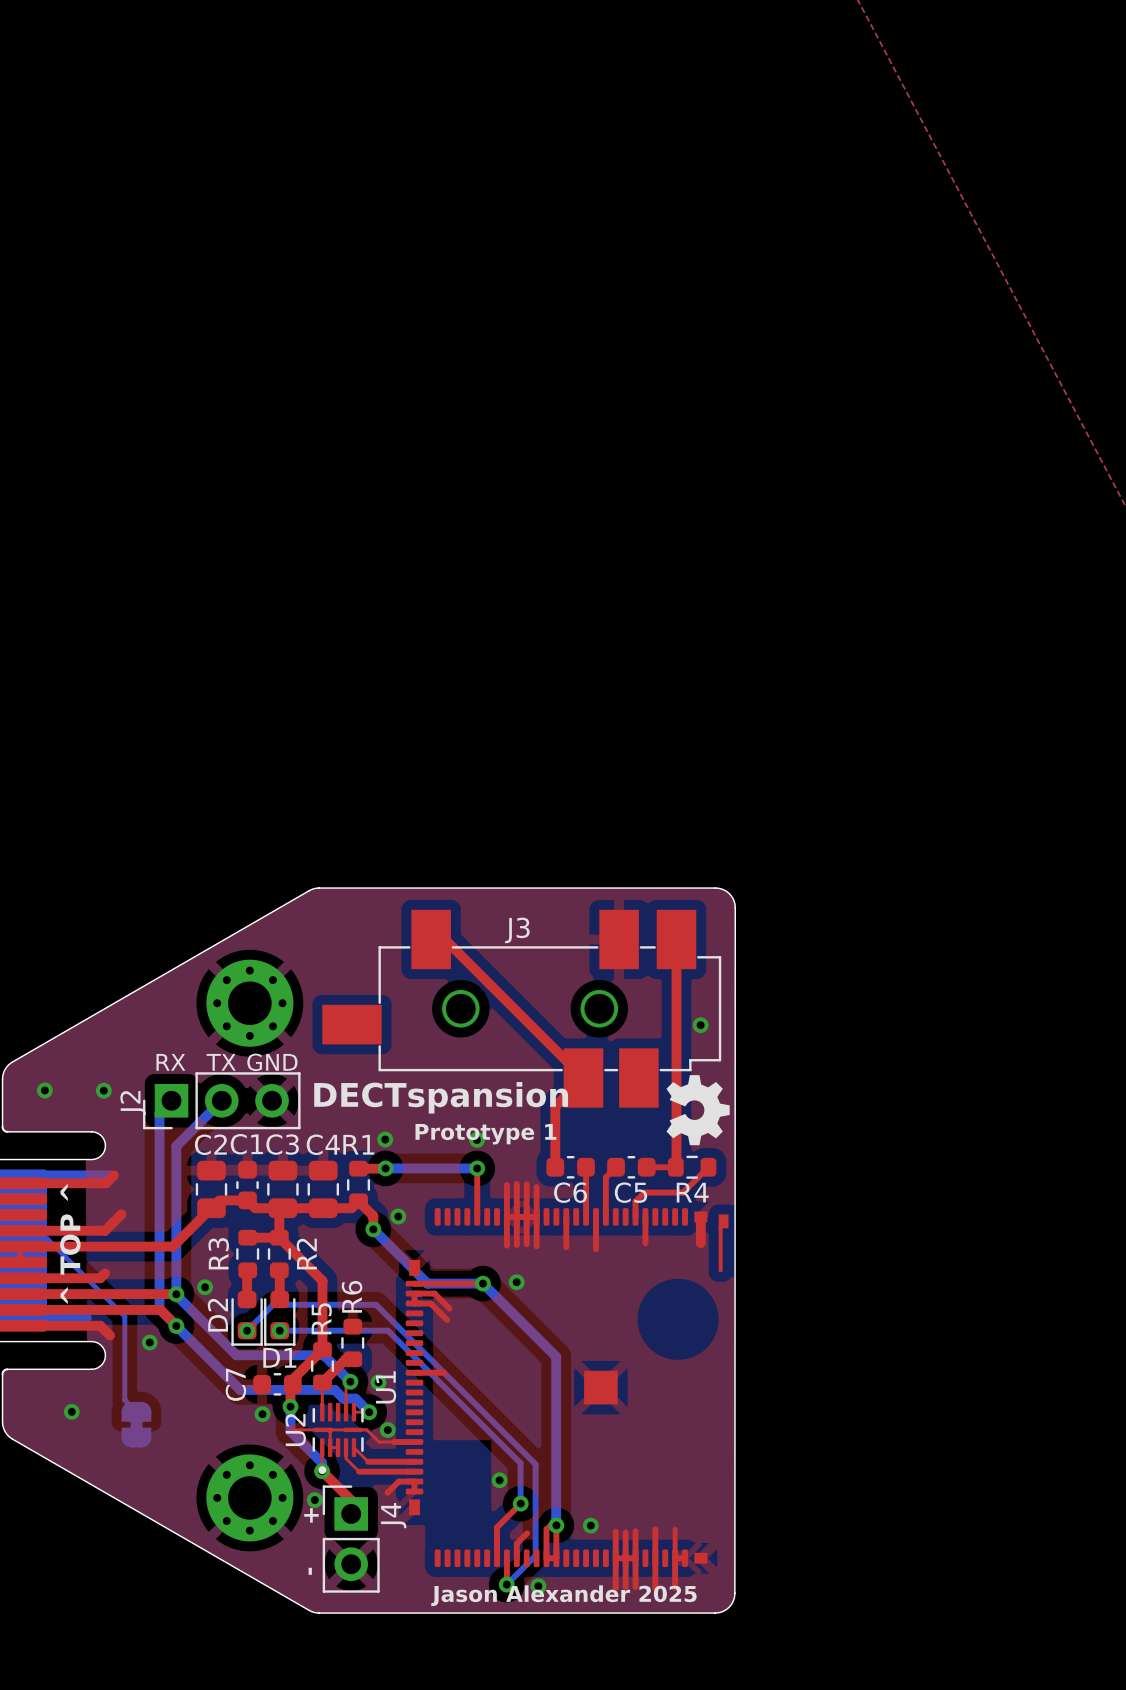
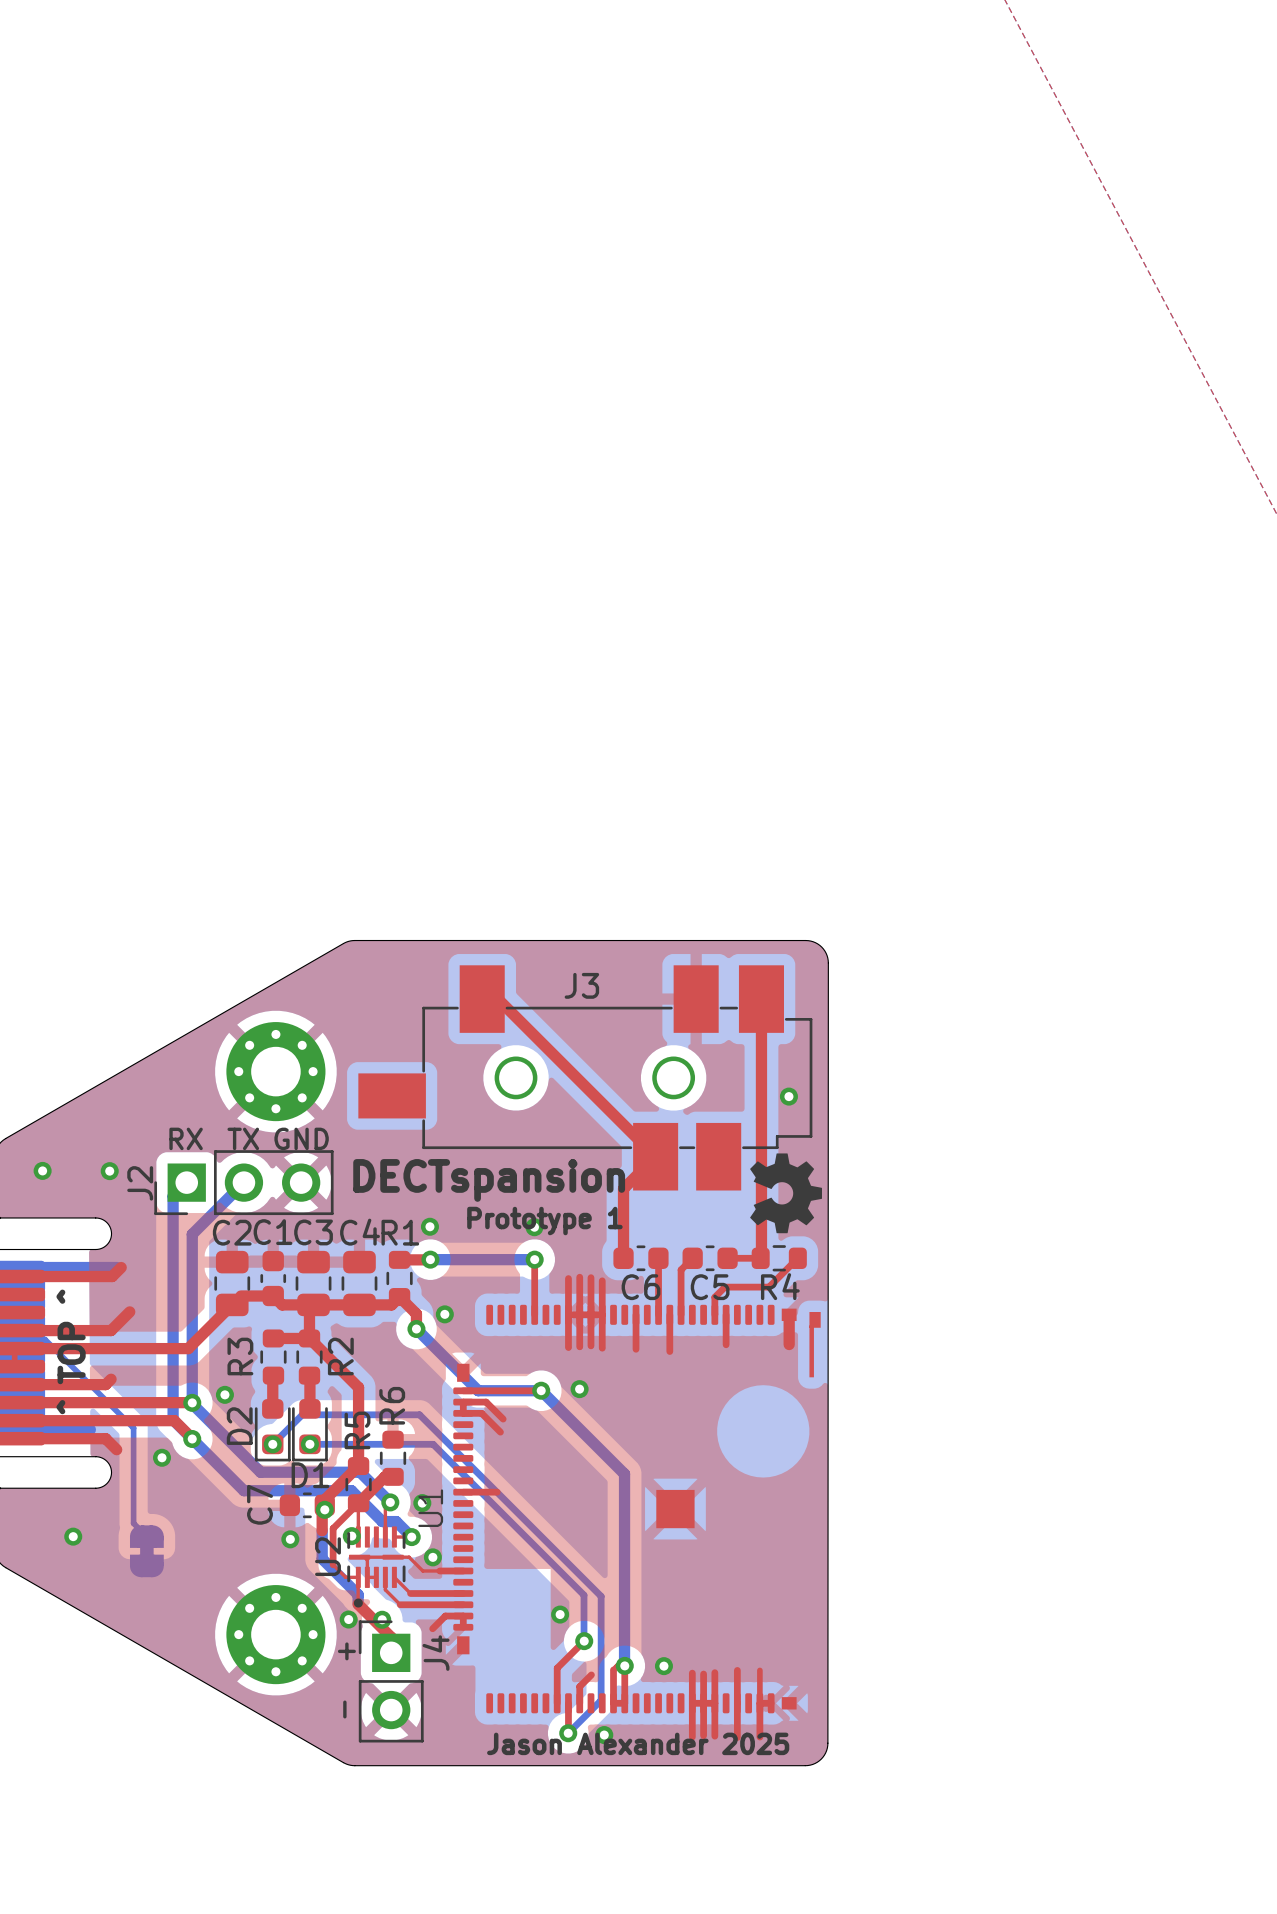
bottom track: (221, 1371) (240, 1389) (334, 1389) -> (243, 1490) (351, 1490) (372, 1511)
top track: none -> (358, 1503) (333, 1528) (333, 1564) (345, 1577) (358, 1577)
via: none -> (324, 1509)
via: (290, 1406) -> none
via: none -> (351, 1536)
top track: (292, 1429) (323, 1429) -> none
via: (322, 1471) -> none
via: none -> (348, 1619)
via: none -> (382, 1619)
via: (314, 1500) -> none

